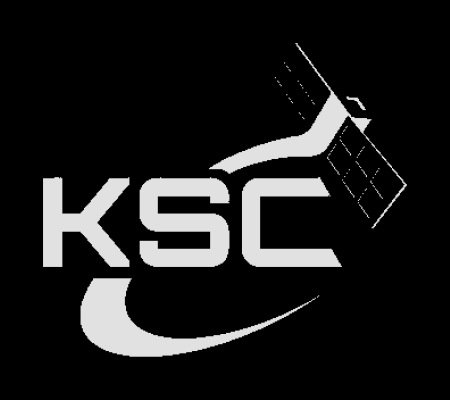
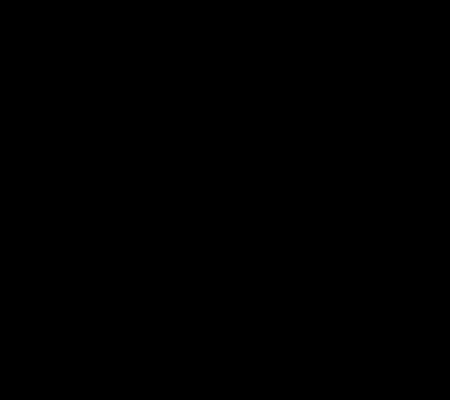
drawing: [43, 43, 407, 357] -> none

